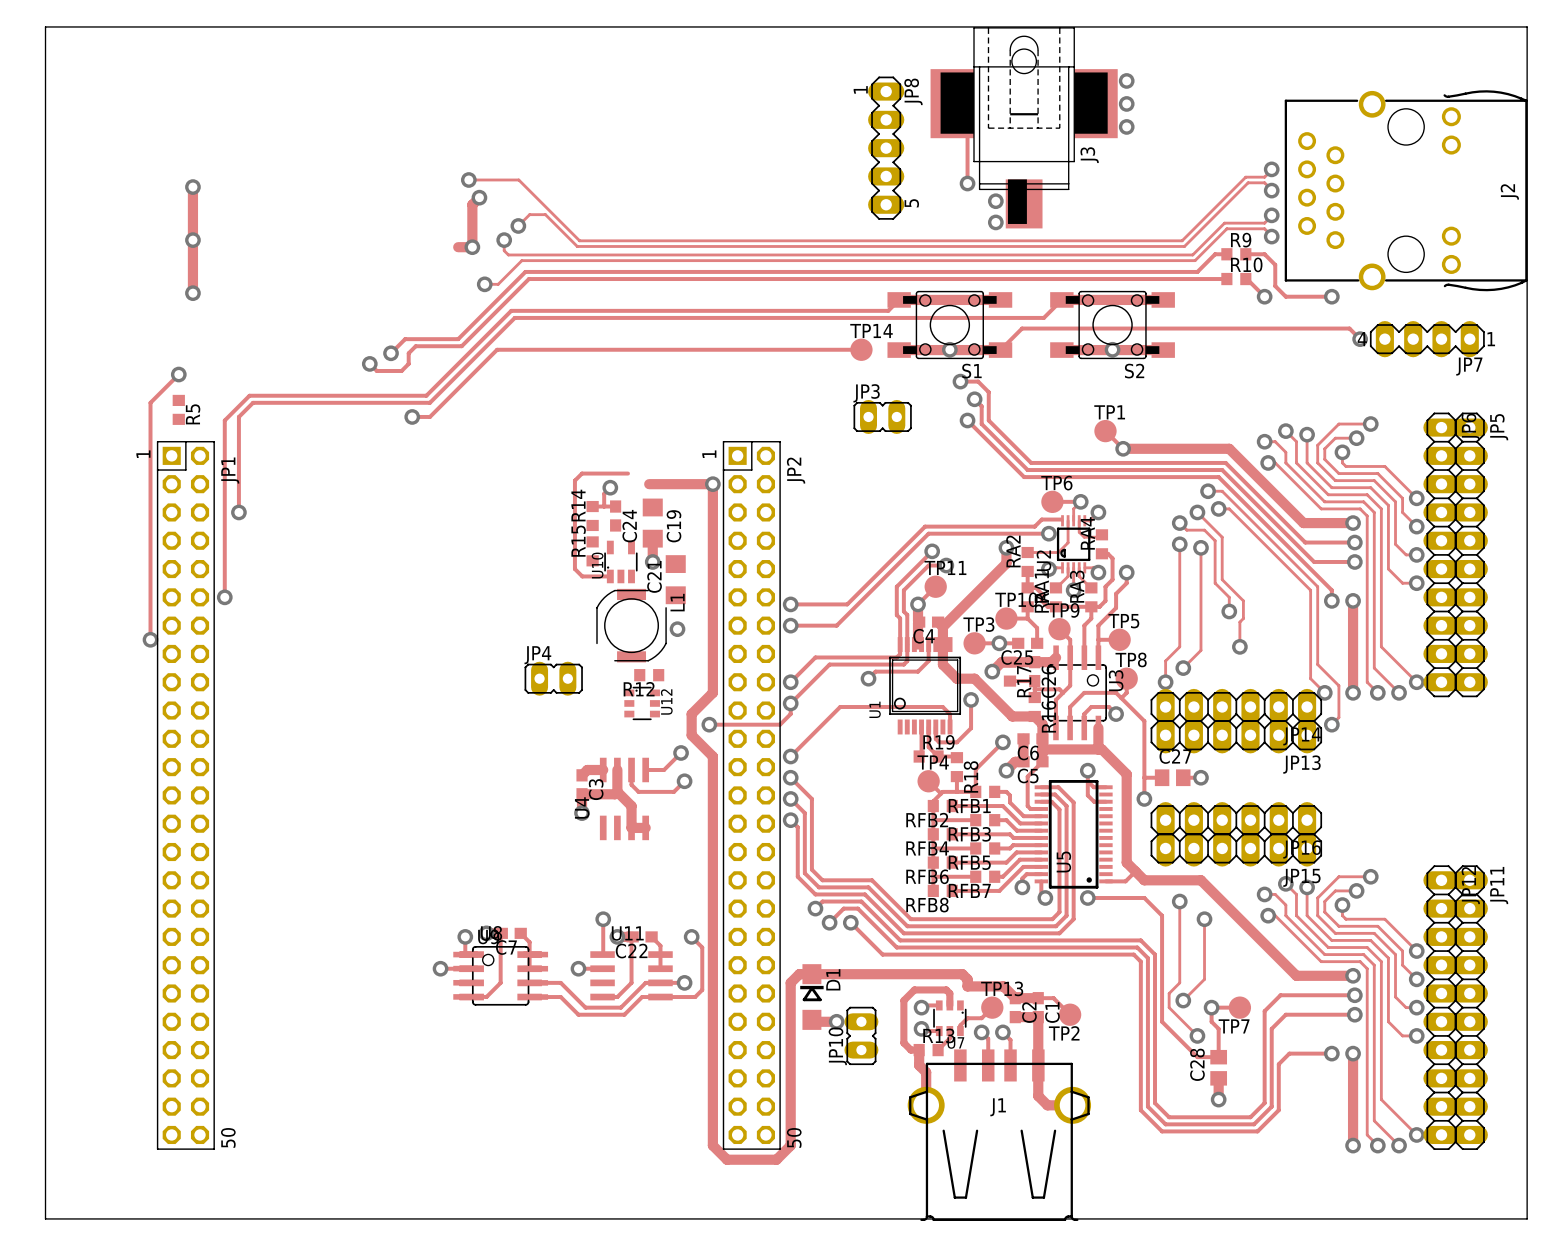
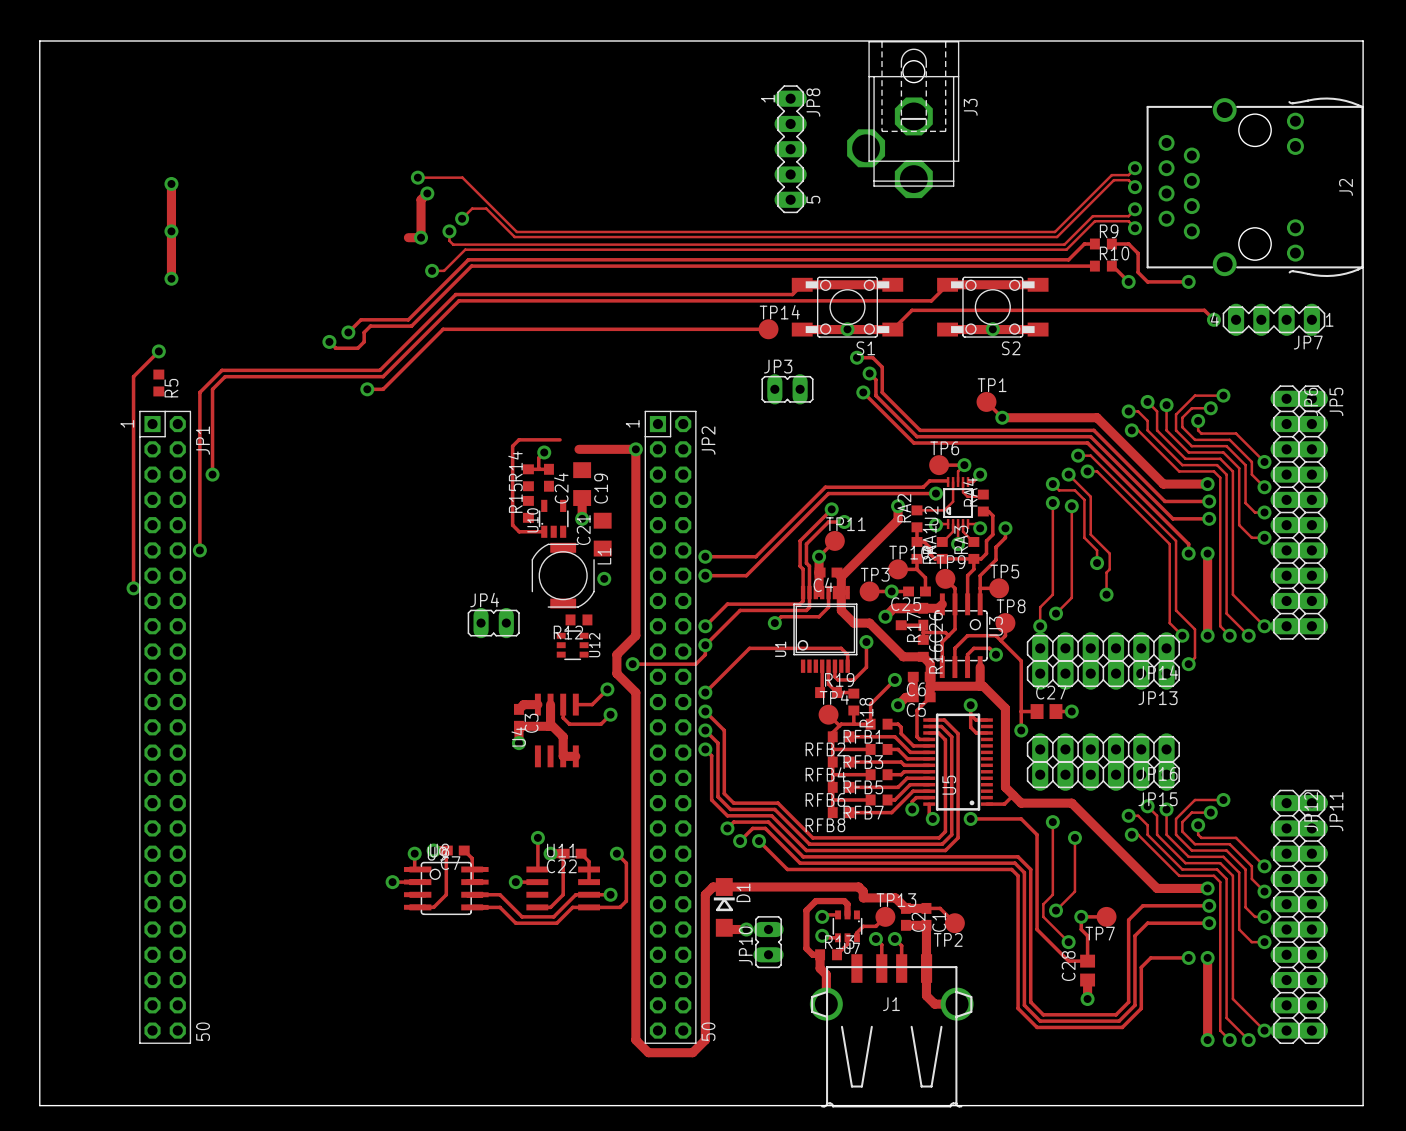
J3 footprint: [930, 27, 1118, 229] -> [847, 41, 960, 199]
via: (1126, 80) -> none
track: (952, 103) (967, 118) (967, 183) -> none
via: (1126, 103) -> none
via: (1126, 126) -> none
J3 name position: J3 (1089, 155) -> J3 (970, 107)
via: (967, 183) -> none
via: (995, 201) -> none
via: (995, 222) -> none

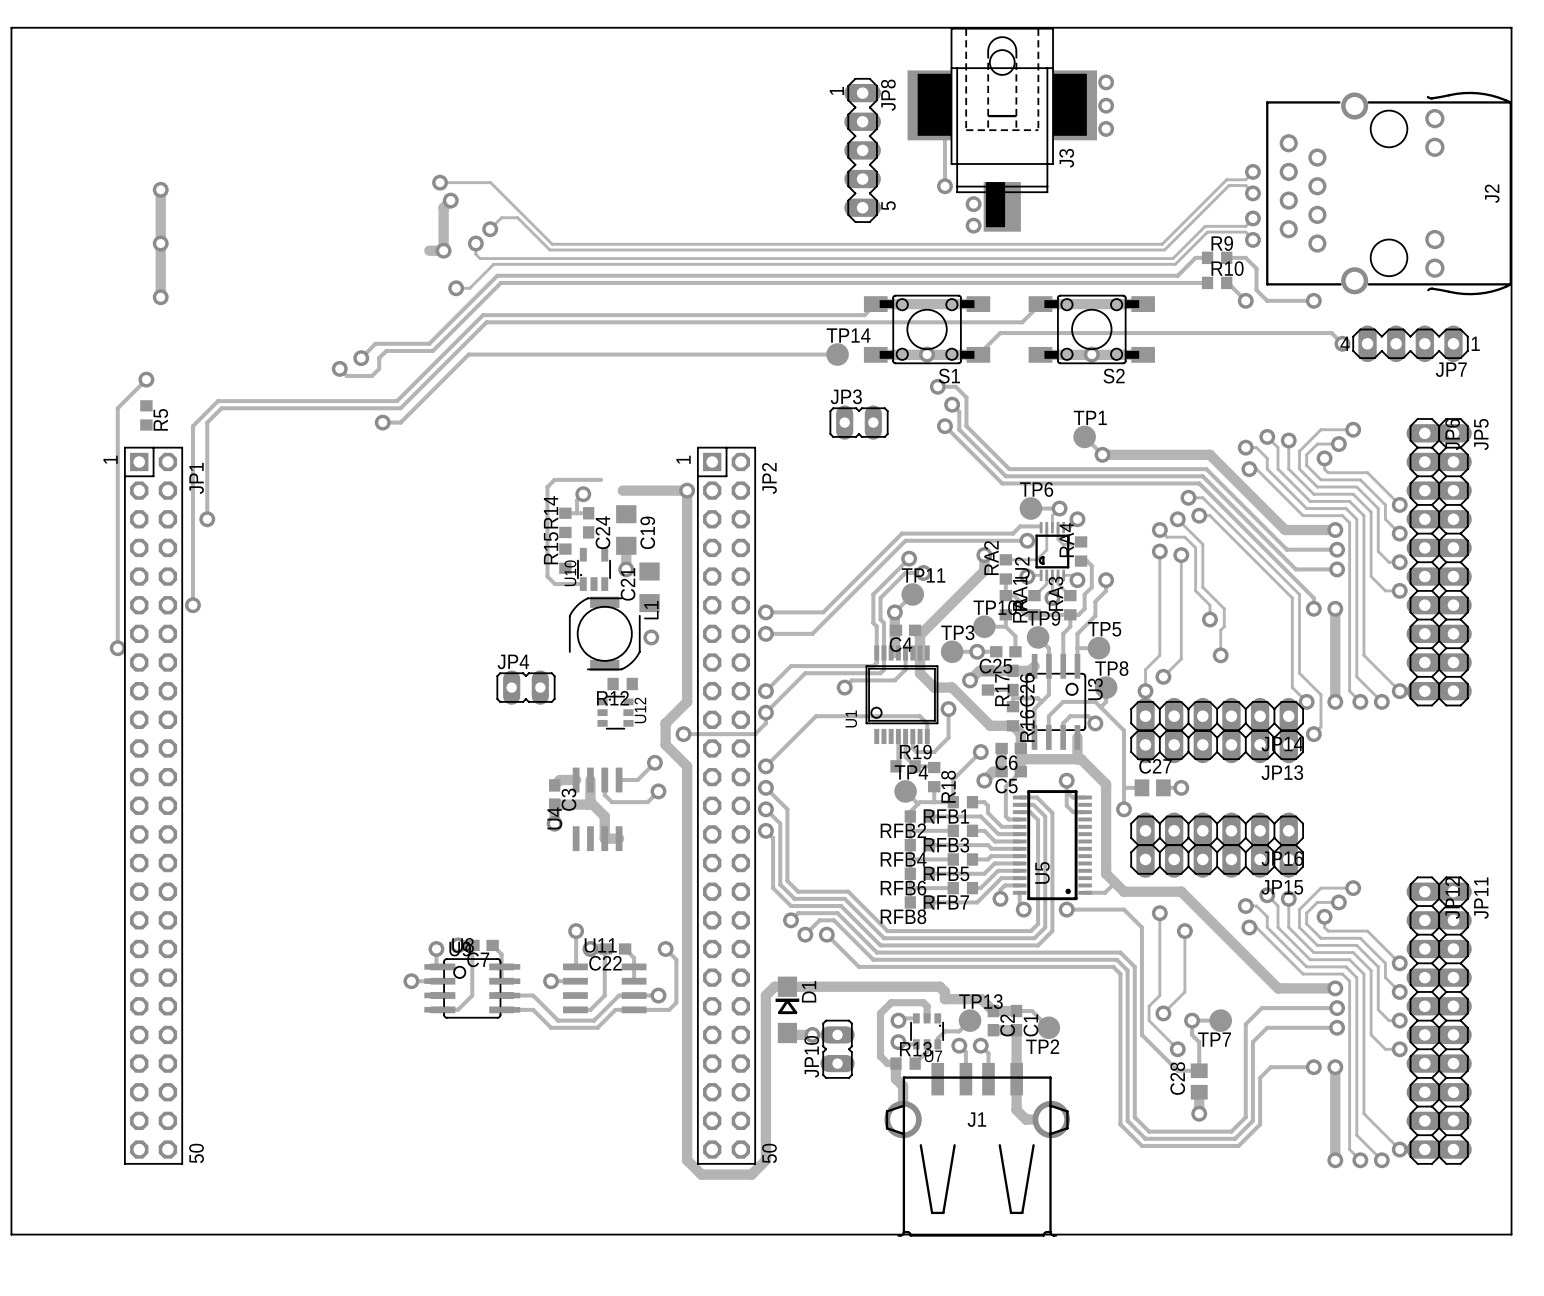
J3 footprint: [847, 41, 960, 199] -> [907, 28, 1098, 232]
via: none -> (1106, 82)
J3 name position: J3 (970, 107) -> J3 (1066, 158)
track: none -> (929, 105) (944, 120) (944, 186)
via: none -> (1106, 105)
via: none -> (1106, 128)
via: none -> (944, 186)
via: none -> (973, 204)
via: none -> (973, 225)

